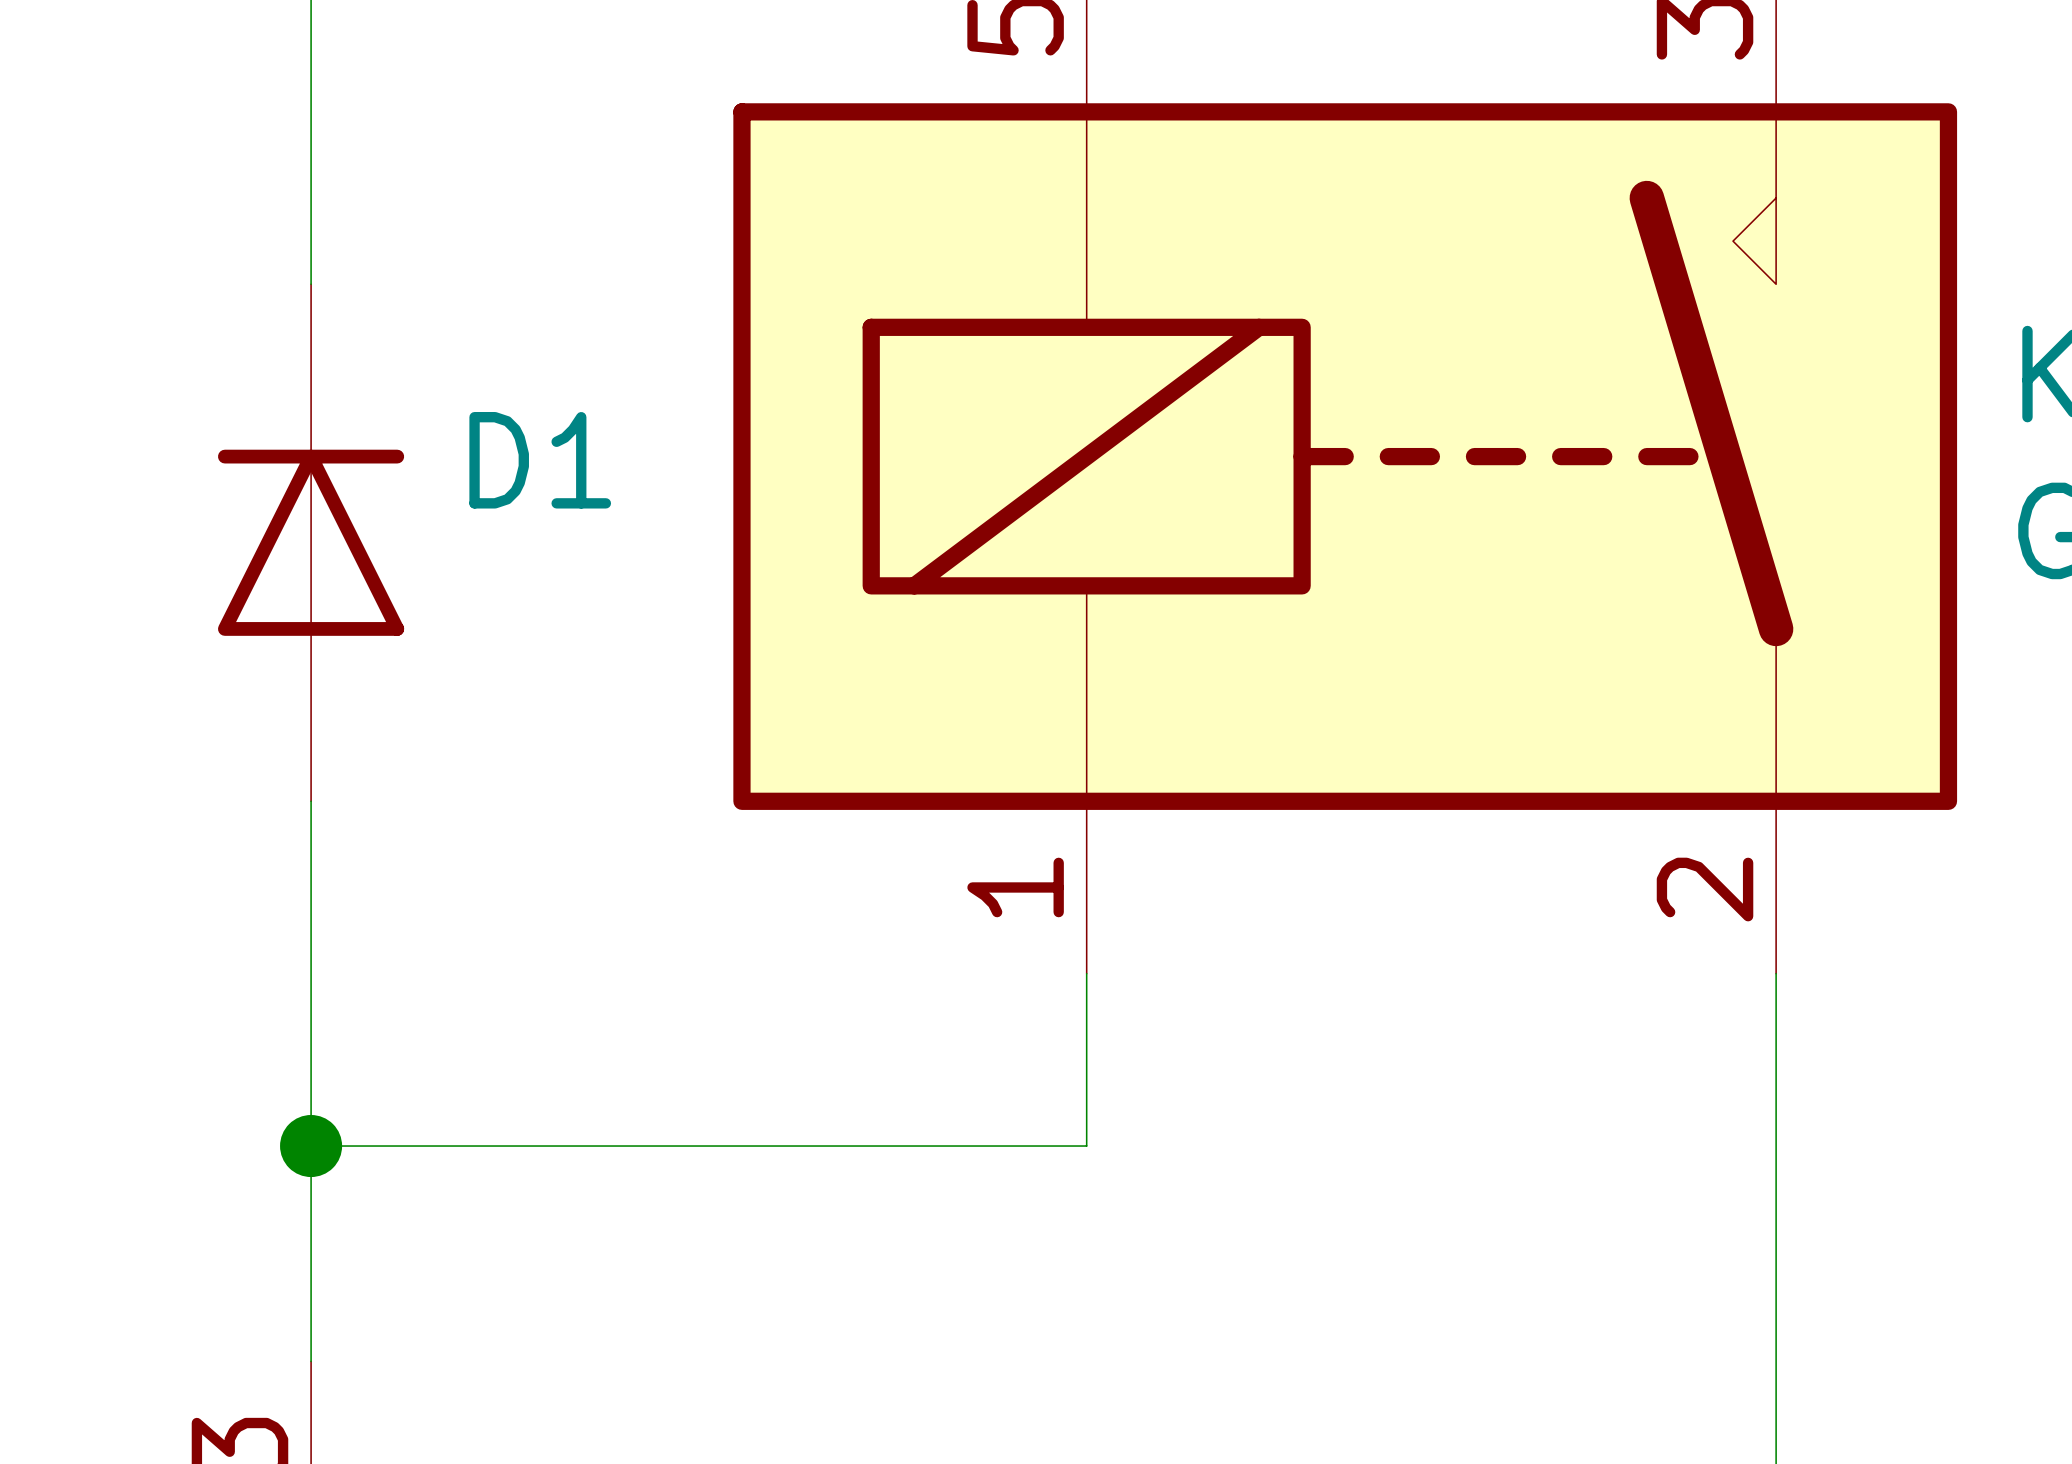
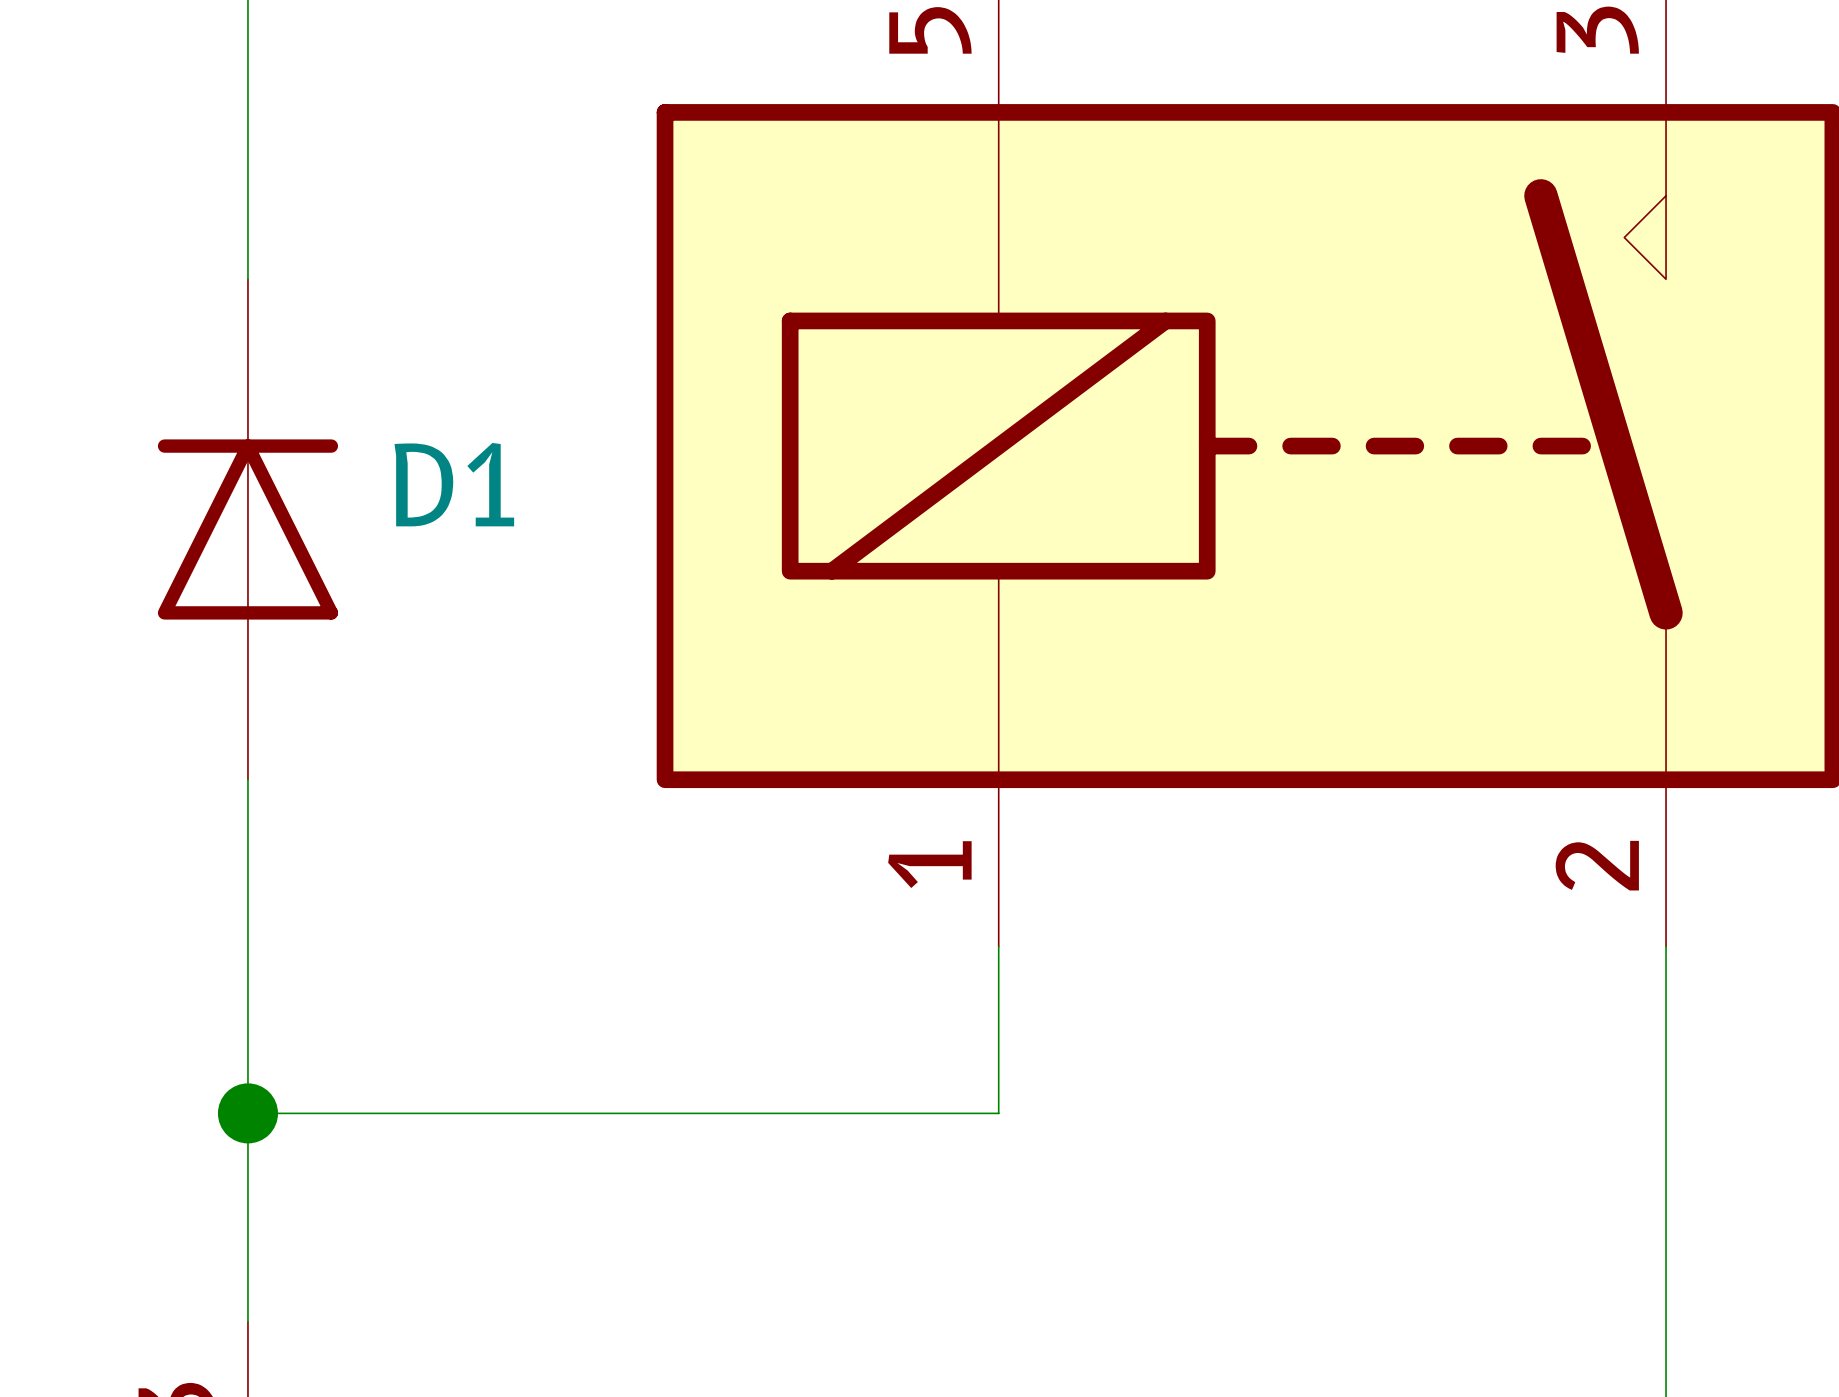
D1 name position: D1 (540, 460) -> D1 (454, 484)

